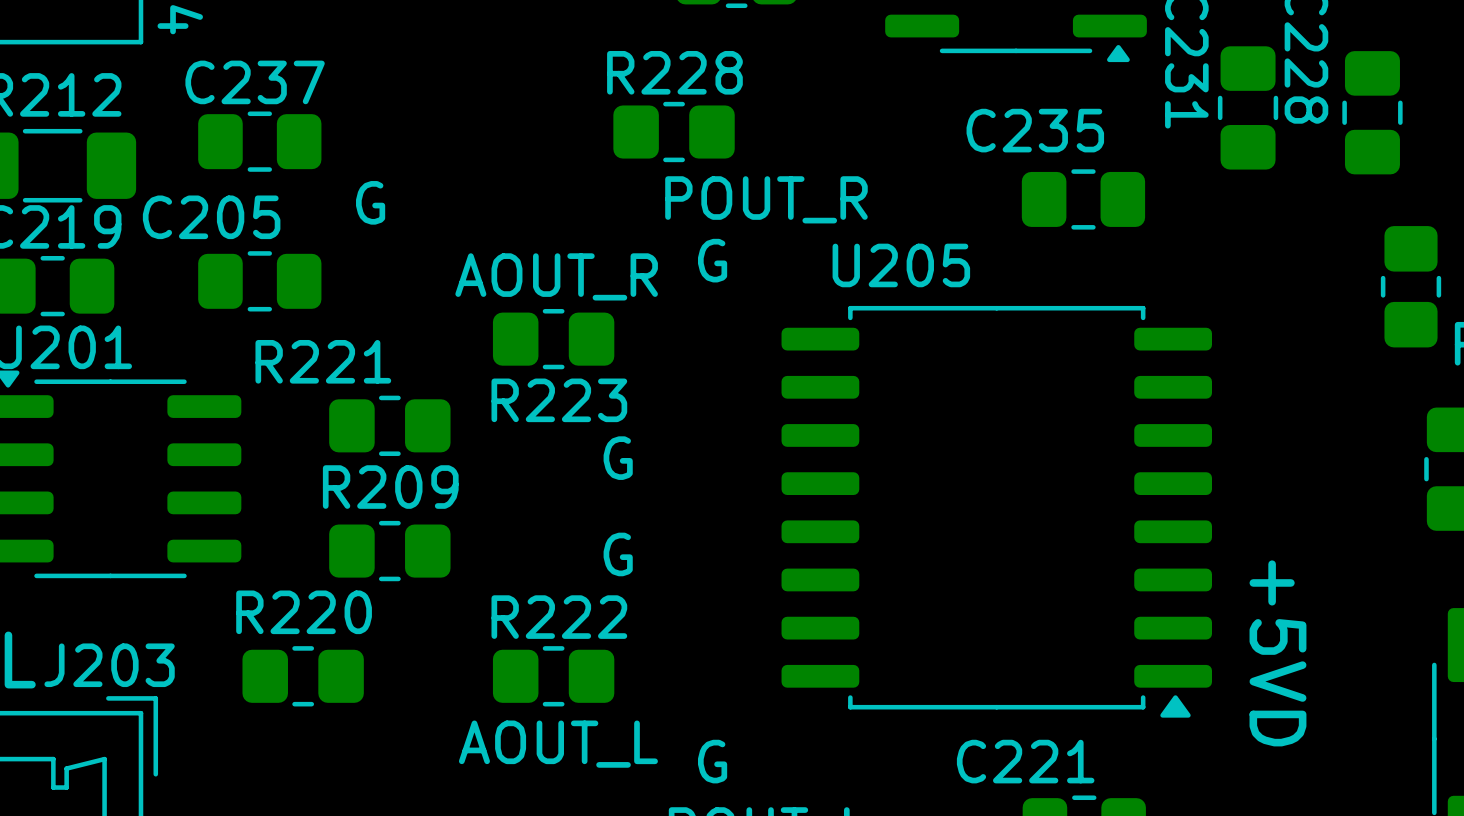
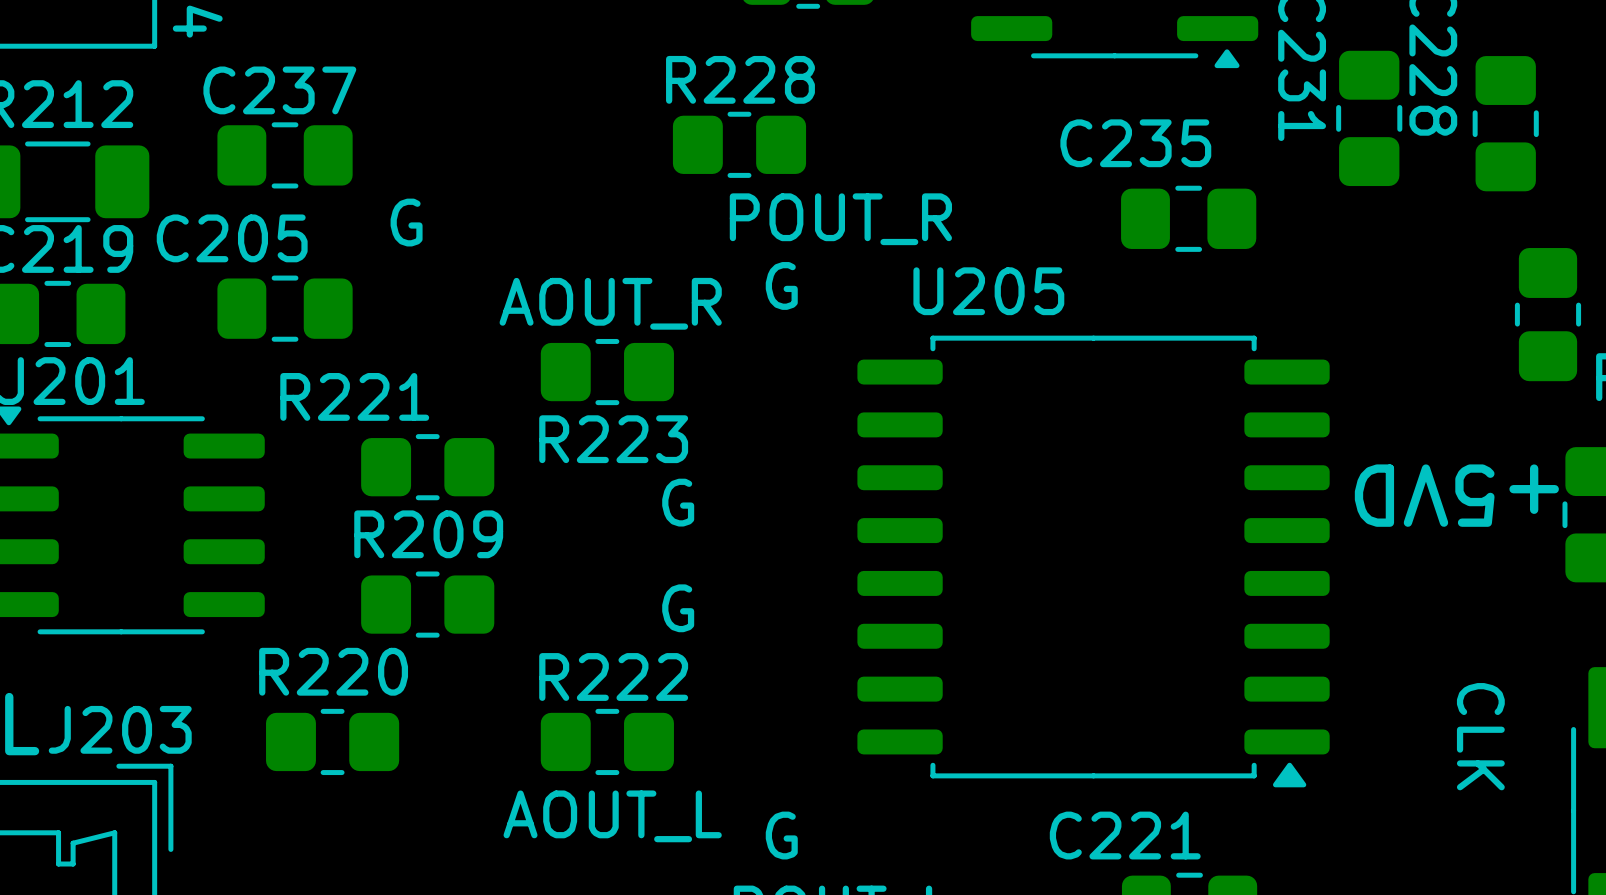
text rotation: 0° (1277, 653) -> 90° clockwise (1456, 495)
text: none -> CLK (1480, 736)

